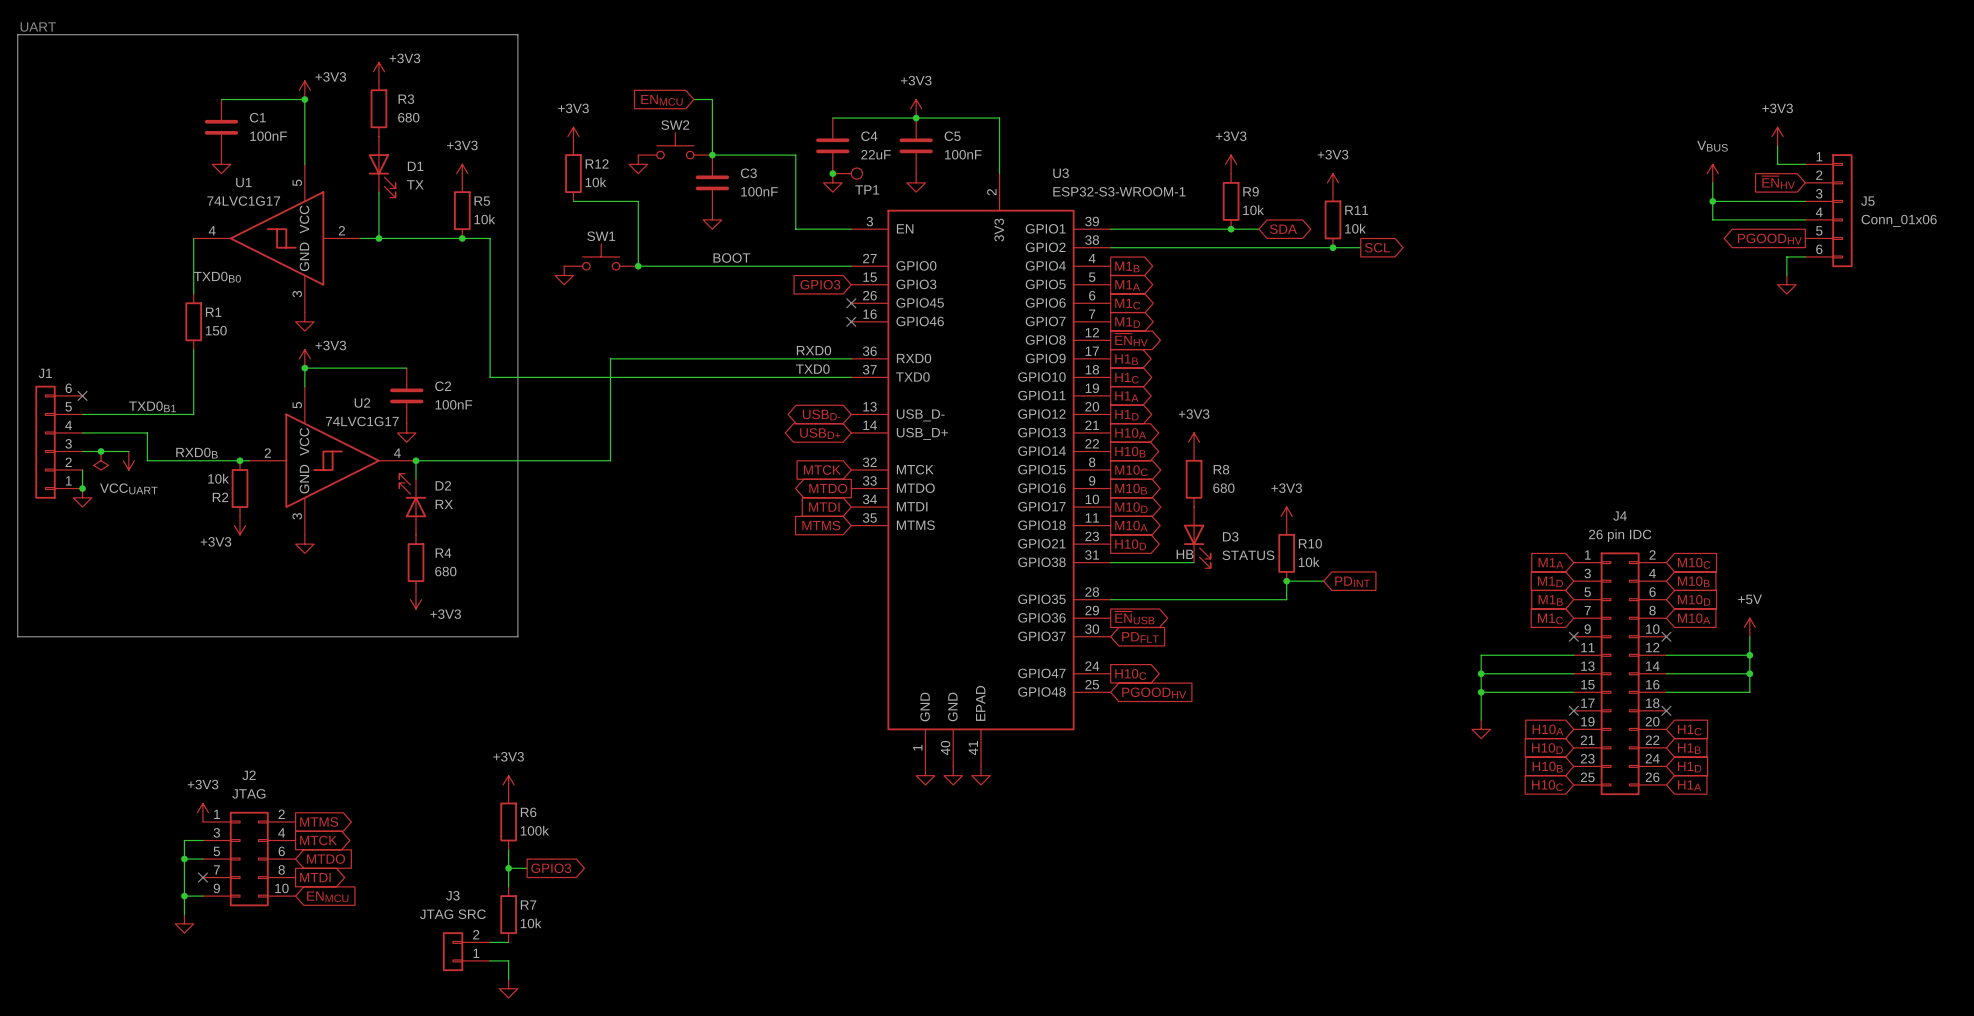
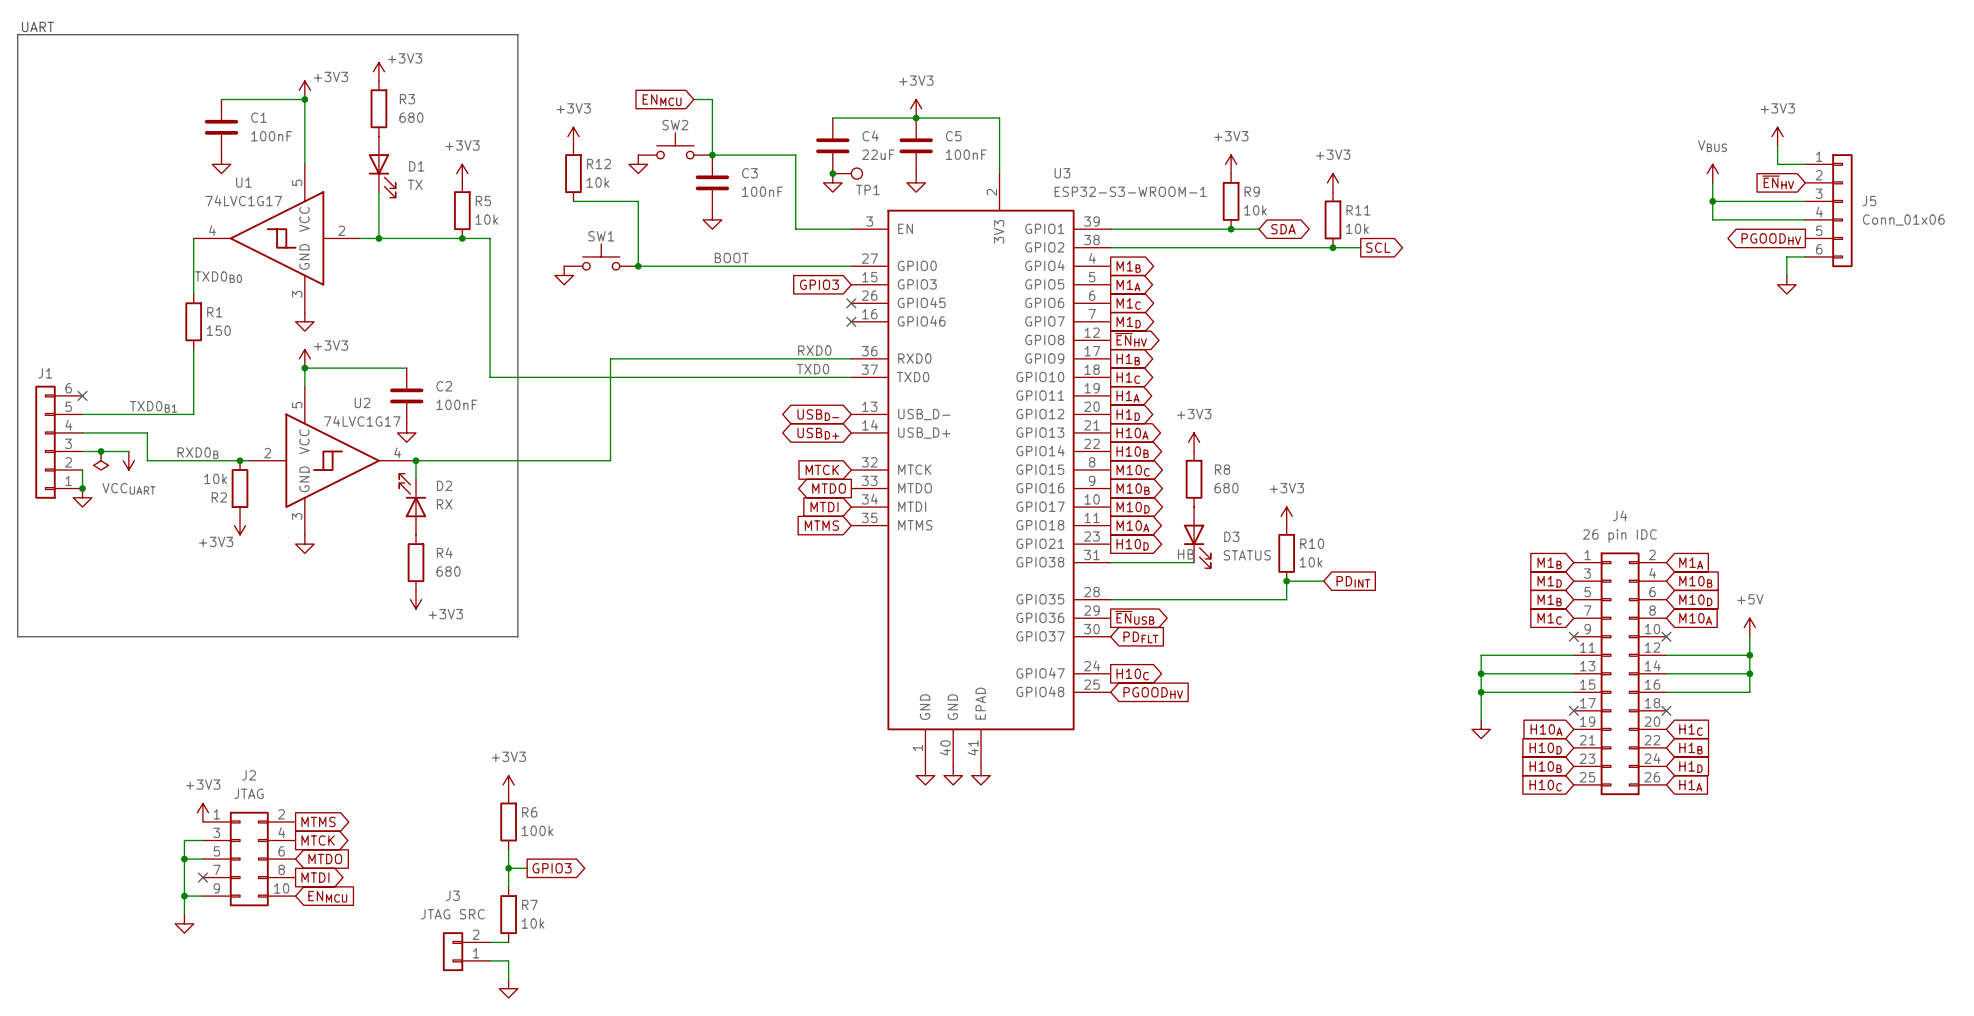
global label: M1A (1550, 563) -> M1B (1549, 563)
global label: M10C (1694, 563) -> M1A (1691, 563)

